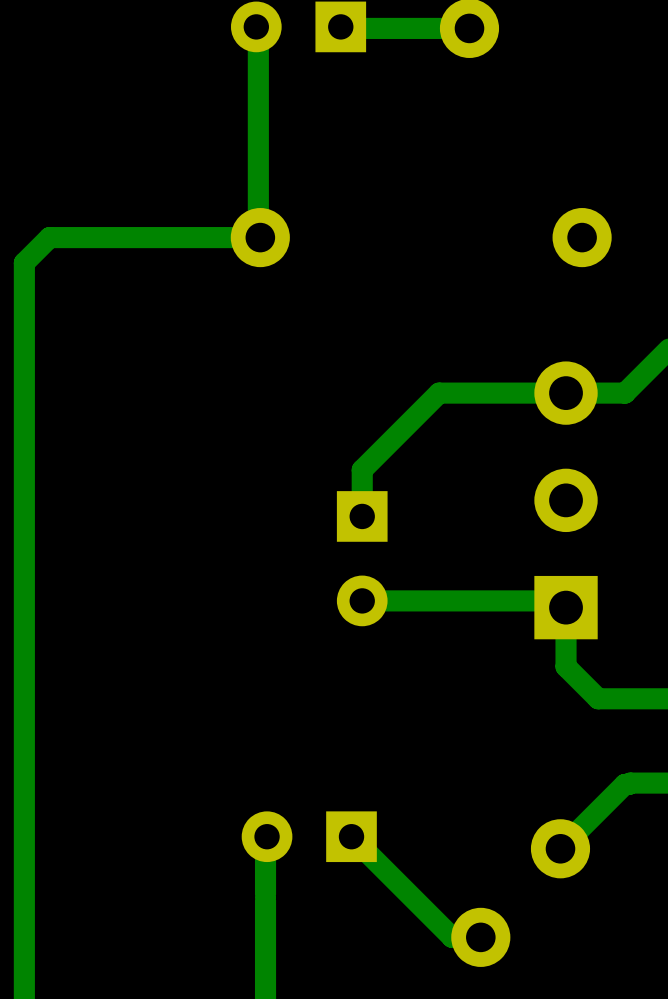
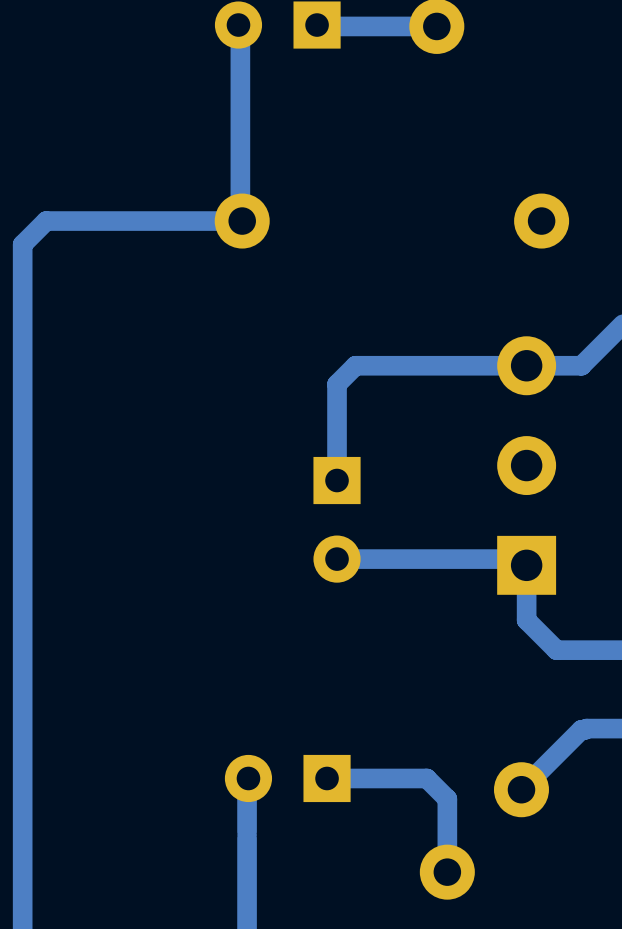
bottom track: (439, 393) (362, 470) -> (408, 365) (355, 365) (337, 384) (337, 437)
bottom track: (351, 836) (452, 937) (480, 937) -> (327, 778) (426, 778) (447, 798) (447, 872)

